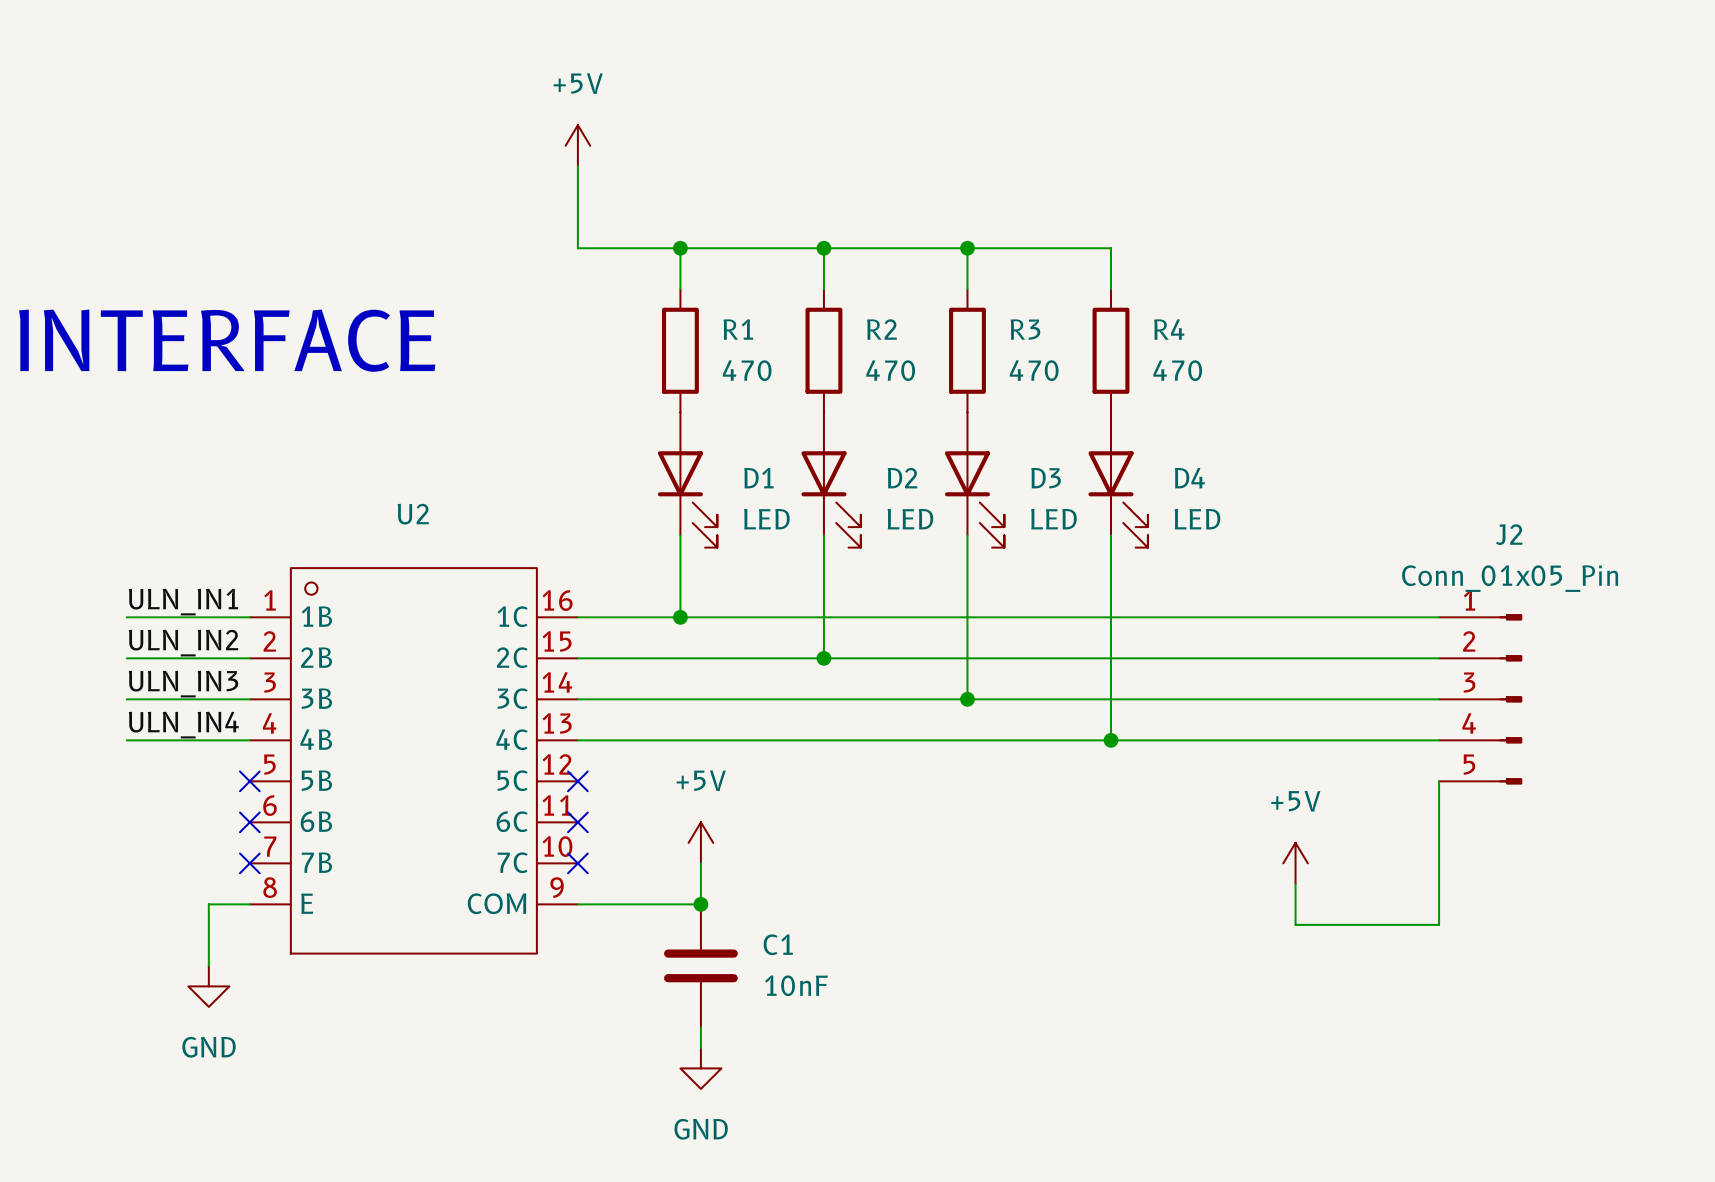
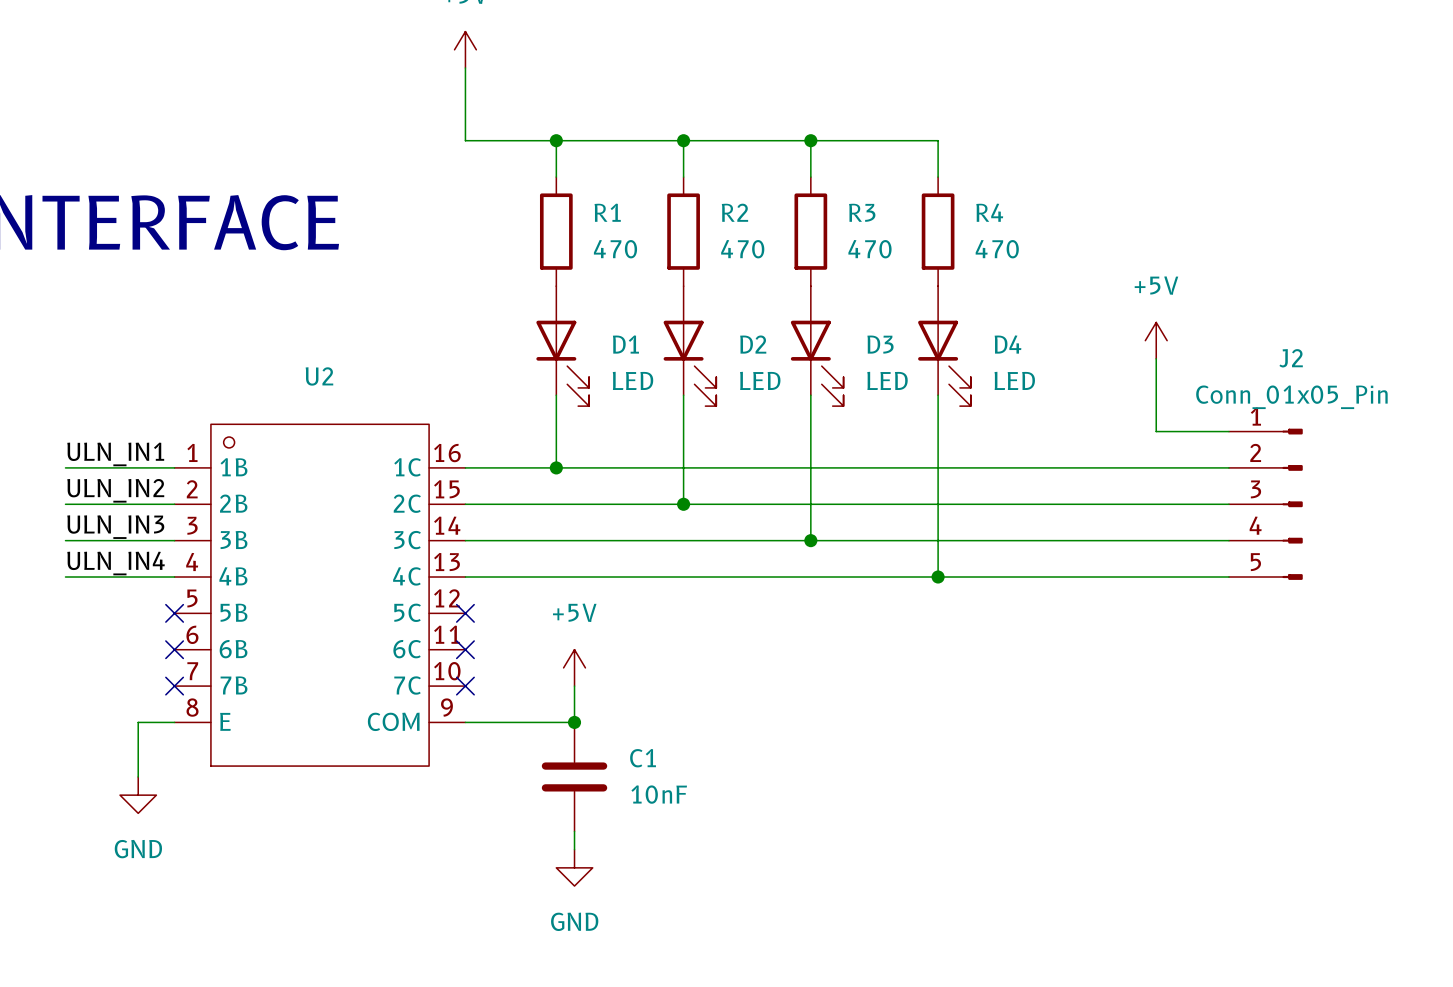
wire: none -> (1156, 358) (1156, 431) (1228, 431)
J2 position: (1480, 699) -> (1265, 504)
wire: (1439, 781) (1439, 924) (1295, 924) (1295, 883) -> none
power symbol position: +5V (1295, 863) -> +5V (1156, 340)

